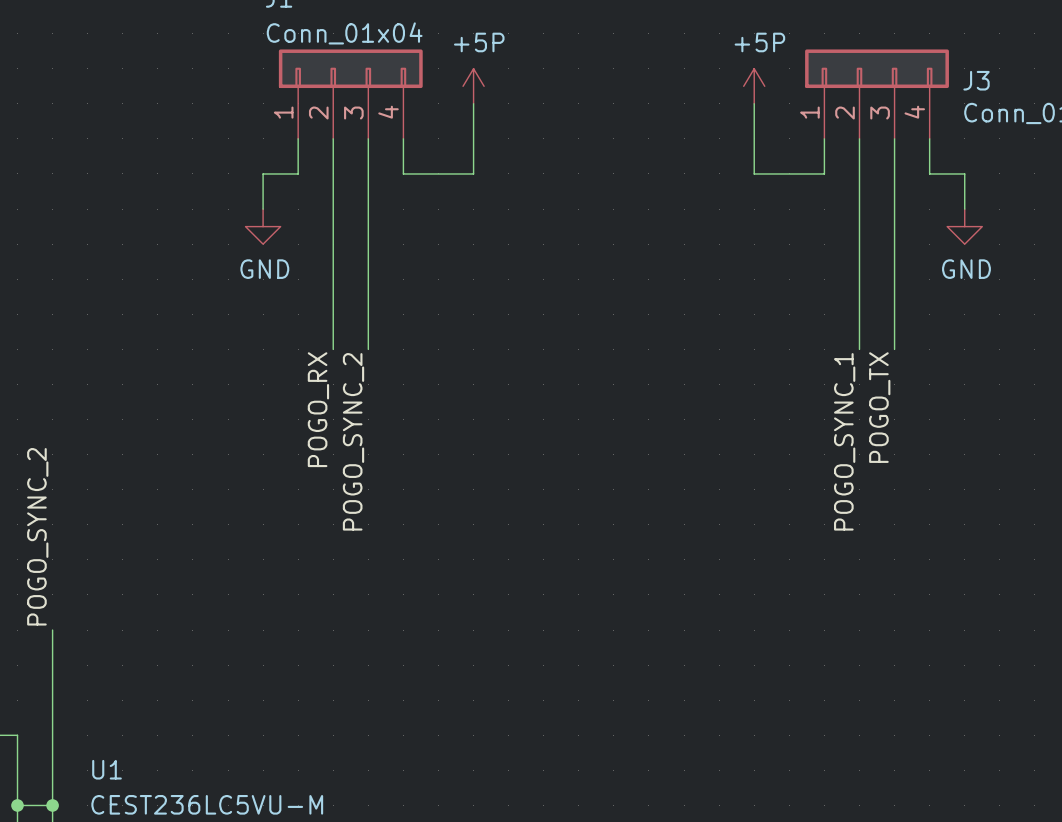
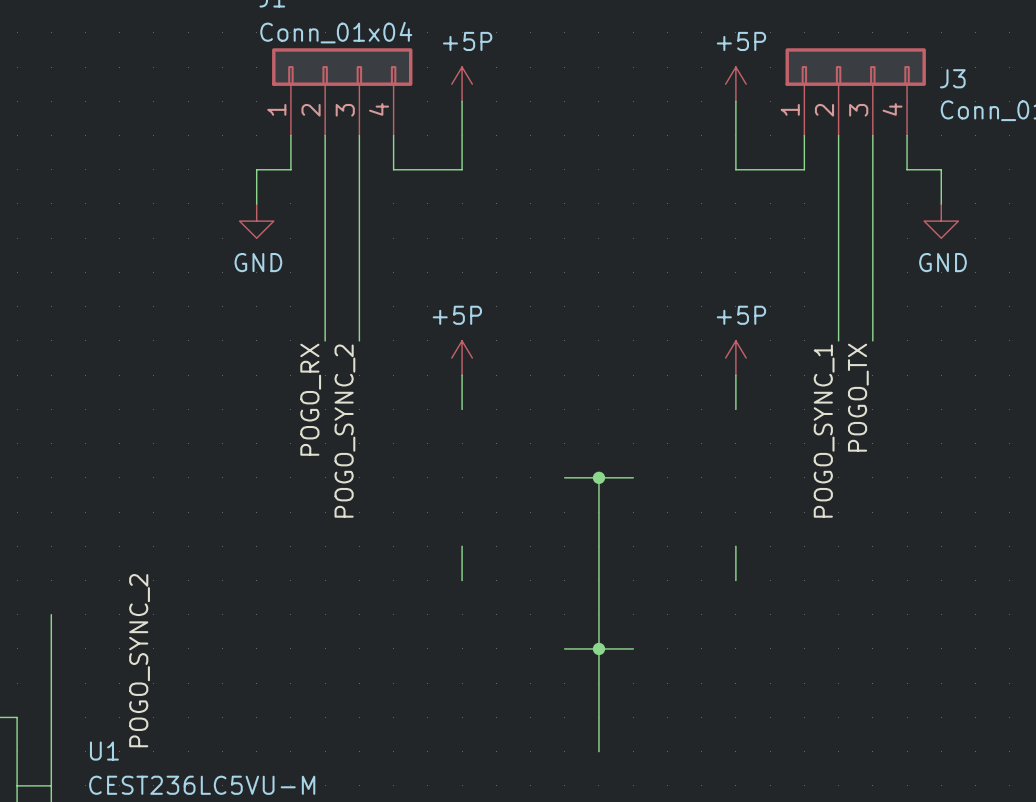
power symbol: none -> +5P (462, 358)
power symbol: none -> +5P (735, 358)
wire: none -> (462, 375) (462, 409)
wire: none -> (735, 375) (735, 409)
wire: none -> (564, 477) (633, 477)
wire: none -> (598, 477) (598, 751)
junction: none -> (598, 477)
label position: POGO_SYNC_2 (37, 536) -> POGO_SYNC_2 (139, 660)
wire: none -> (462, 546) (462, 580)
wire: none -> (735, 546) (735, 580)
wire: none -> (564, 648) (633, 648)
junction: none -> (598, 648)
junction: (17, 805) -> none
junction: (52, 805) -> none

